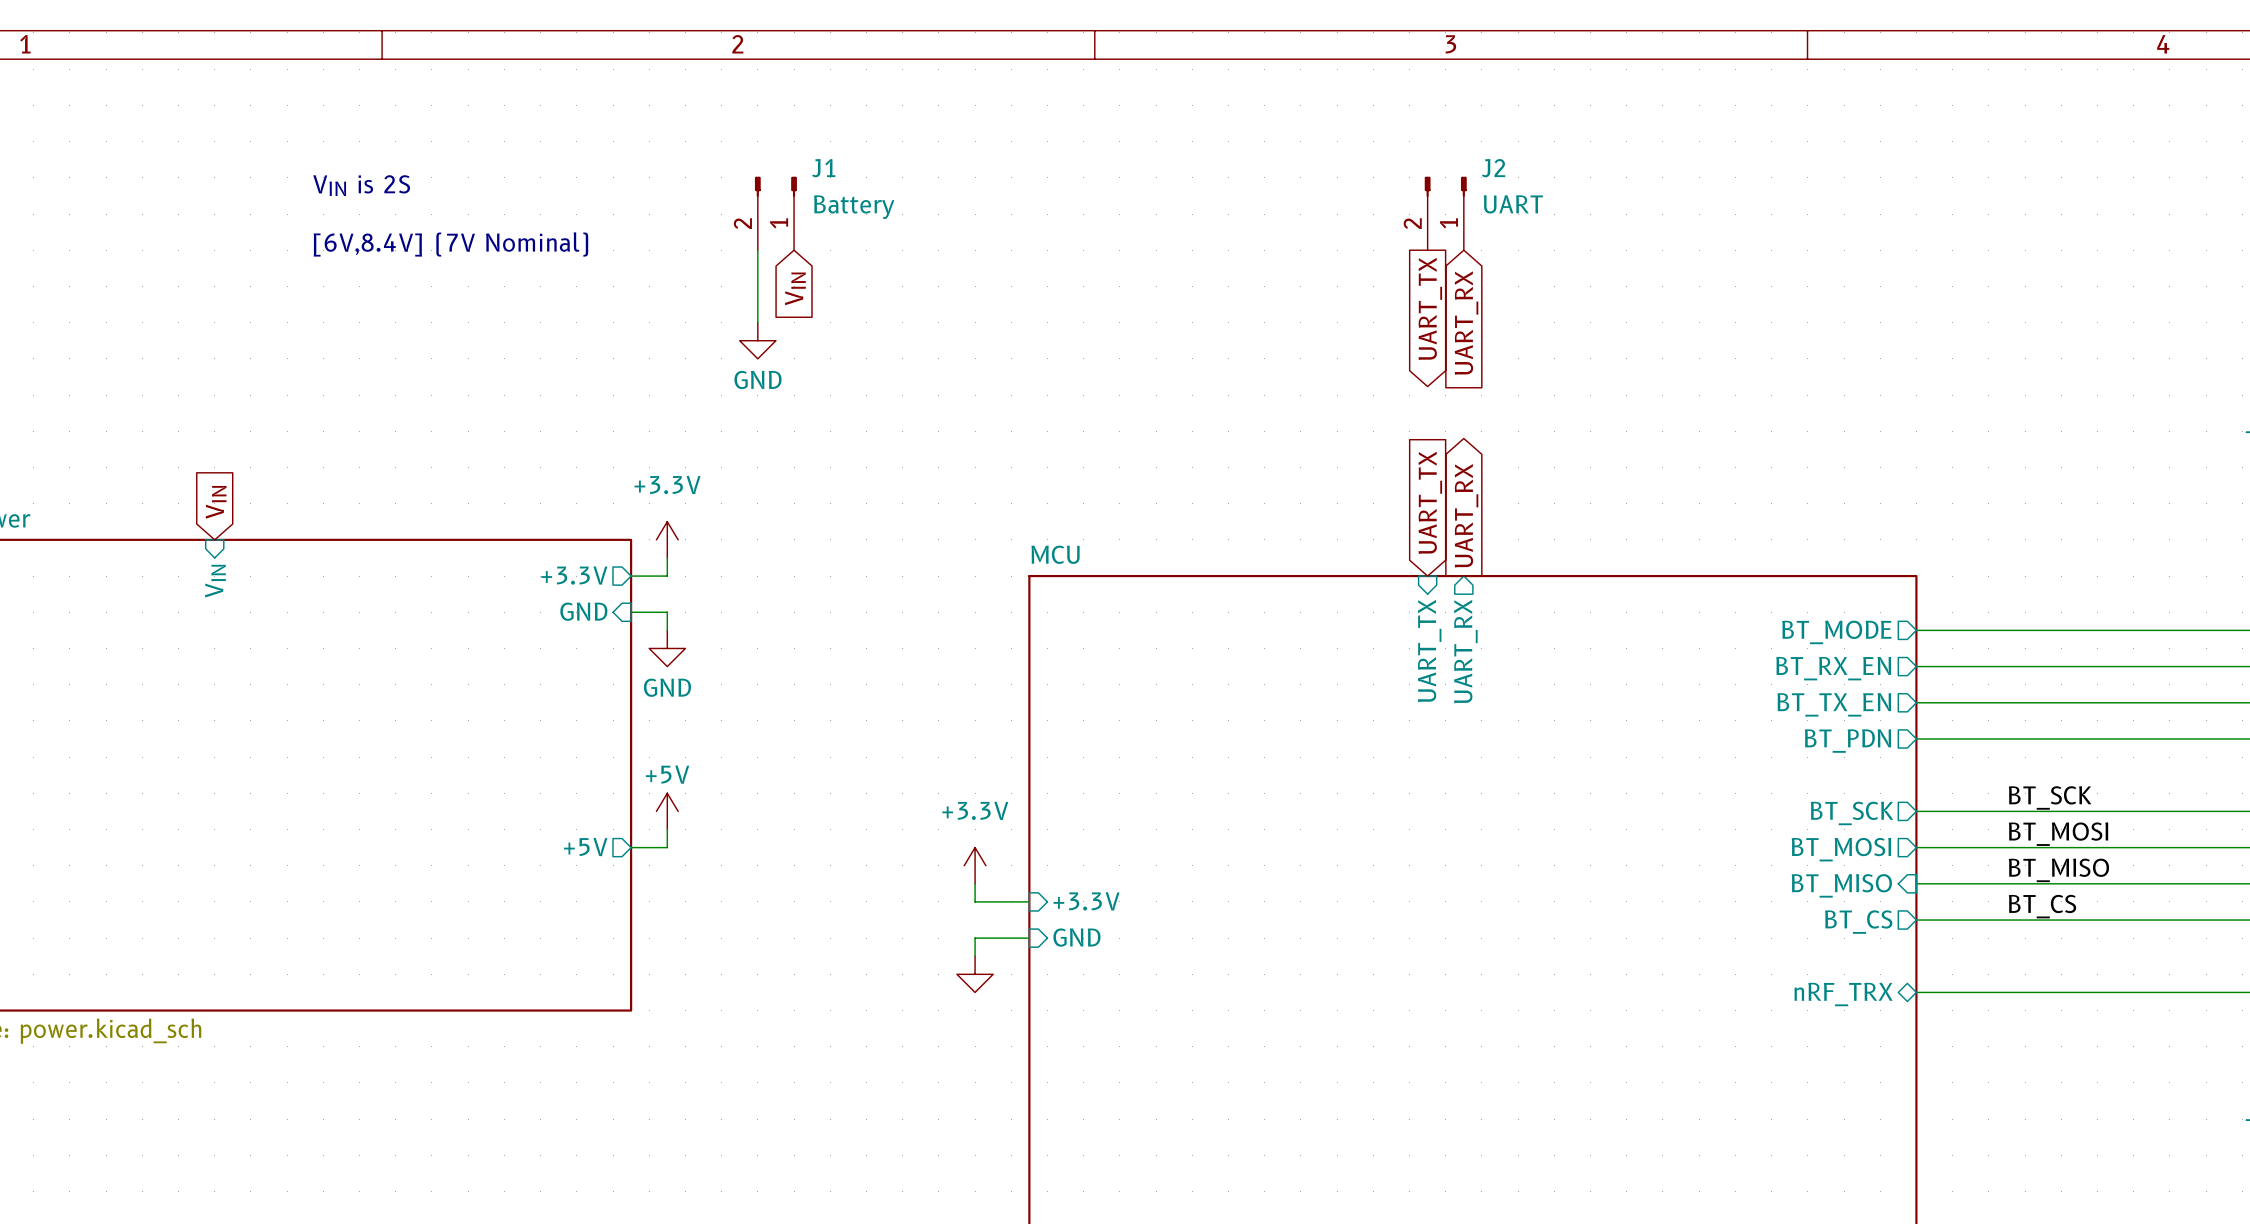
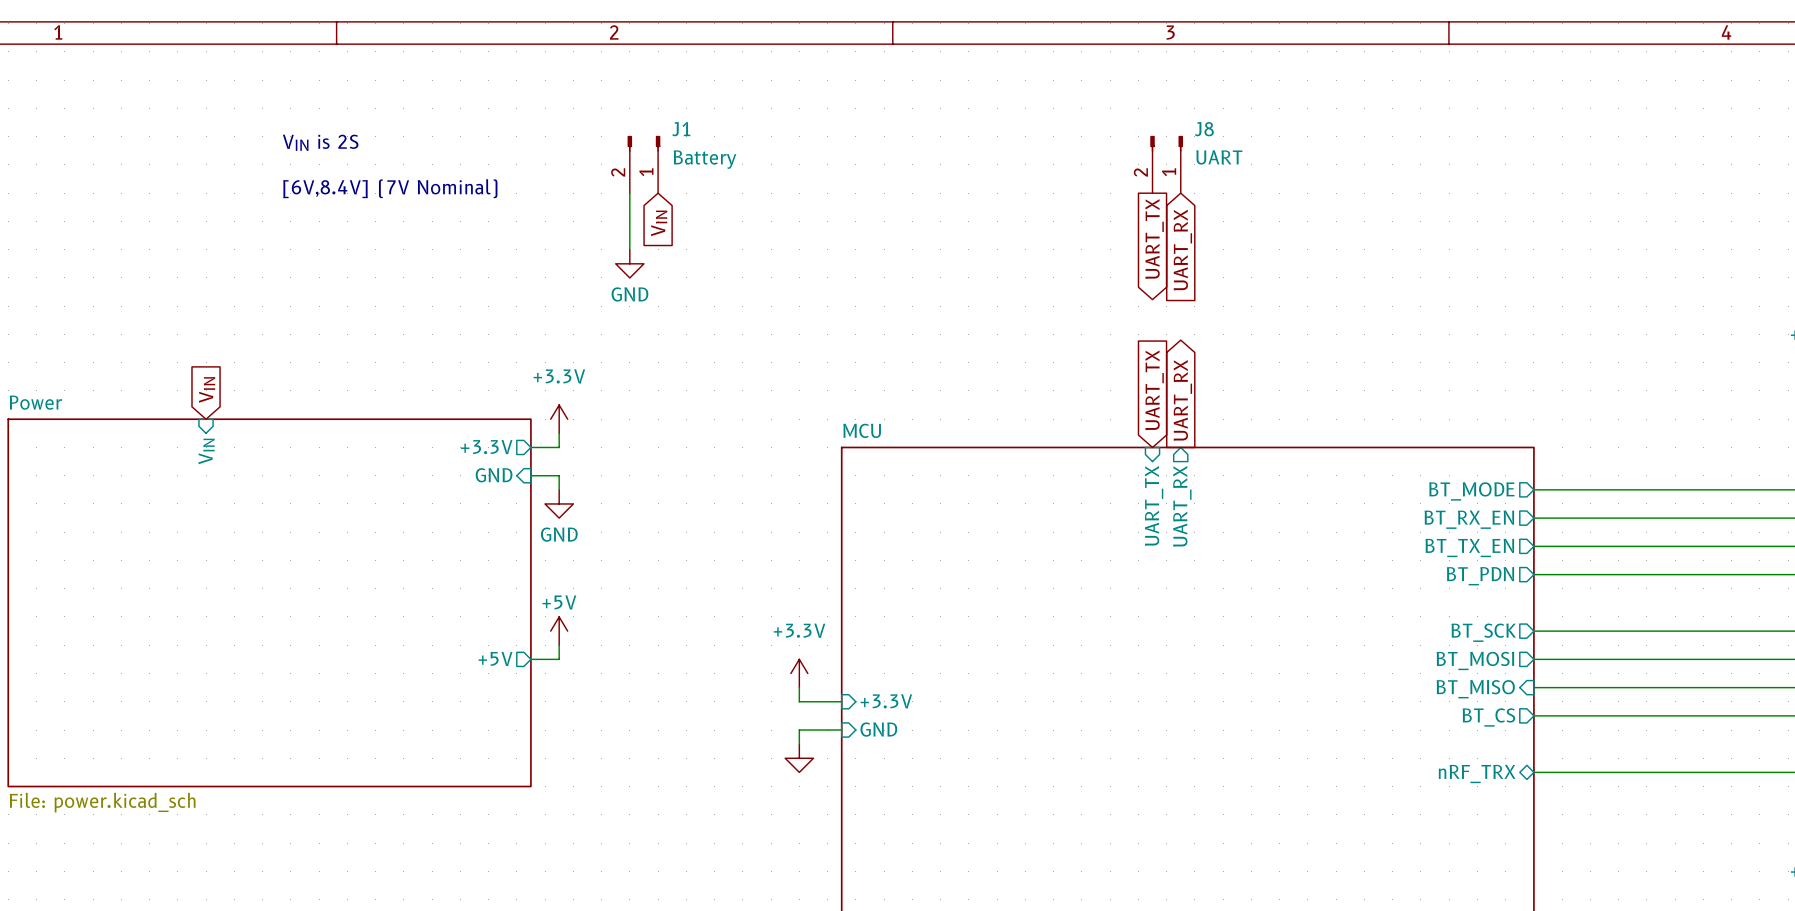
J2 name: J2 (1493, 168) -> J8 (1204, 129)
label: BT_SCK (2050, 797) -> none
label: BT_MOSI (2058, 834) -> none
label: BT_MISO (2058, 870) -> none
label: BT_CS (2042, 906) -> none

